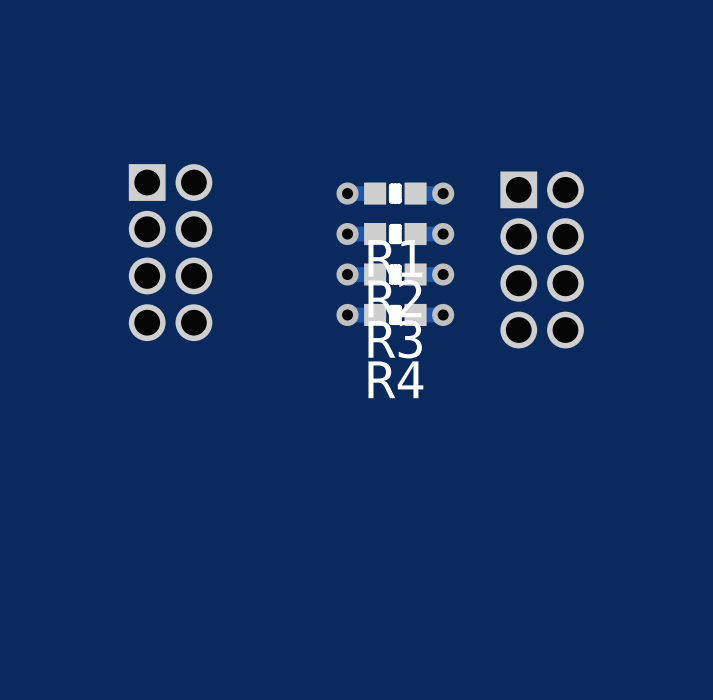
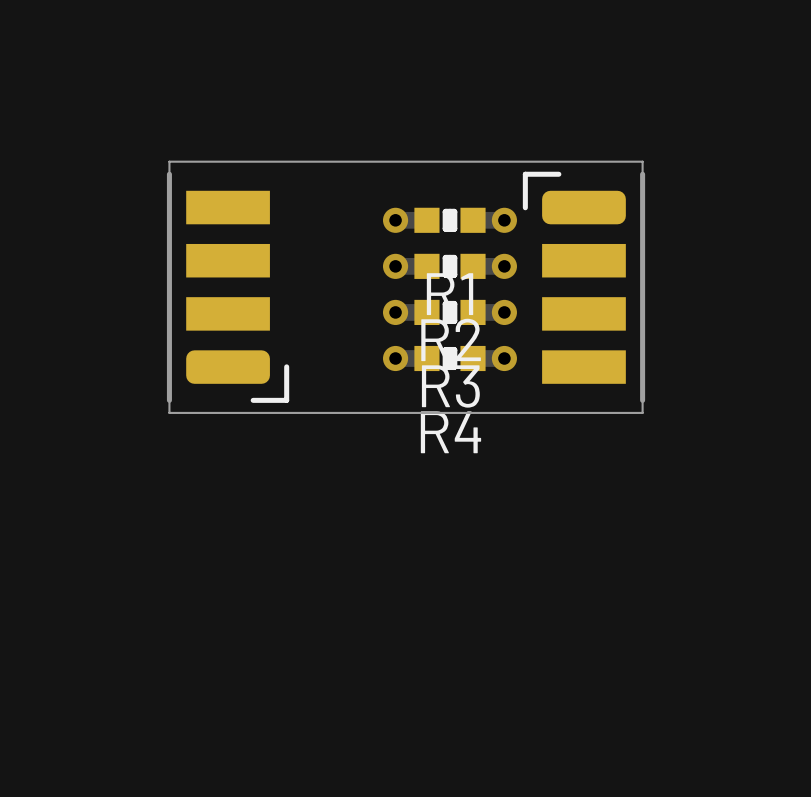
board edge: none -> (642, 174) (642, 161) (169, 161) (169, 174)
part footprint: [128, 164, 213, 342] -> [166, 171, 290, 403]
part footprint: [500, 171, 584, 349] -> [522, 171, 646, 403]
board edge: none -> (642, 400) (642, 412) (169, 412) (169, 400)

